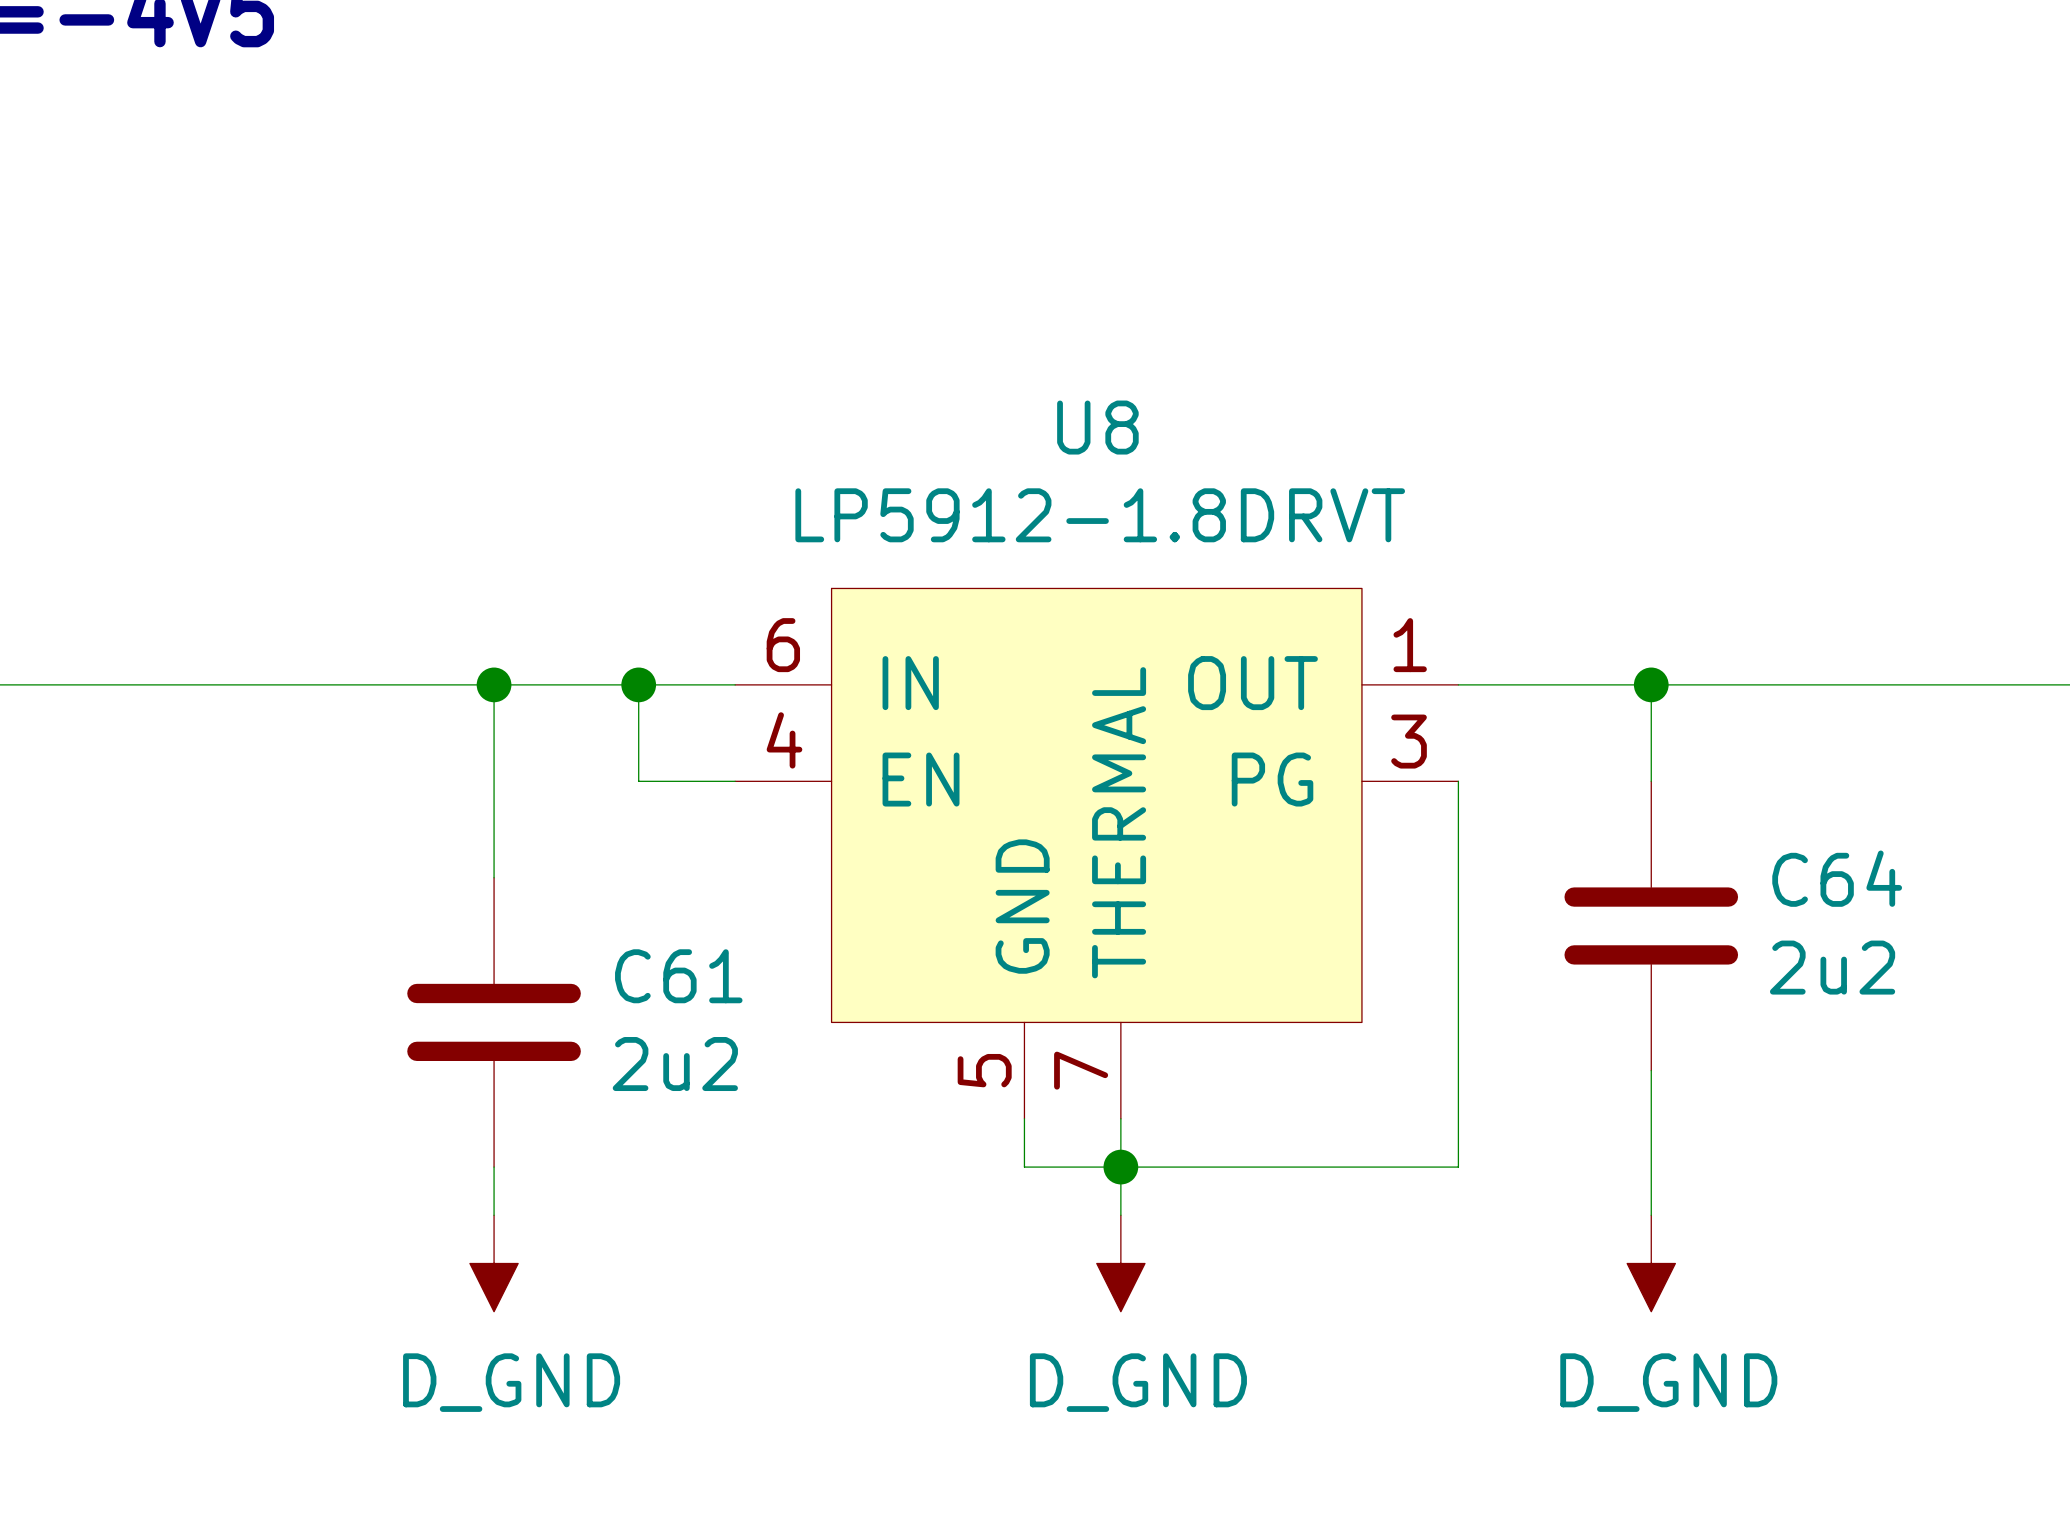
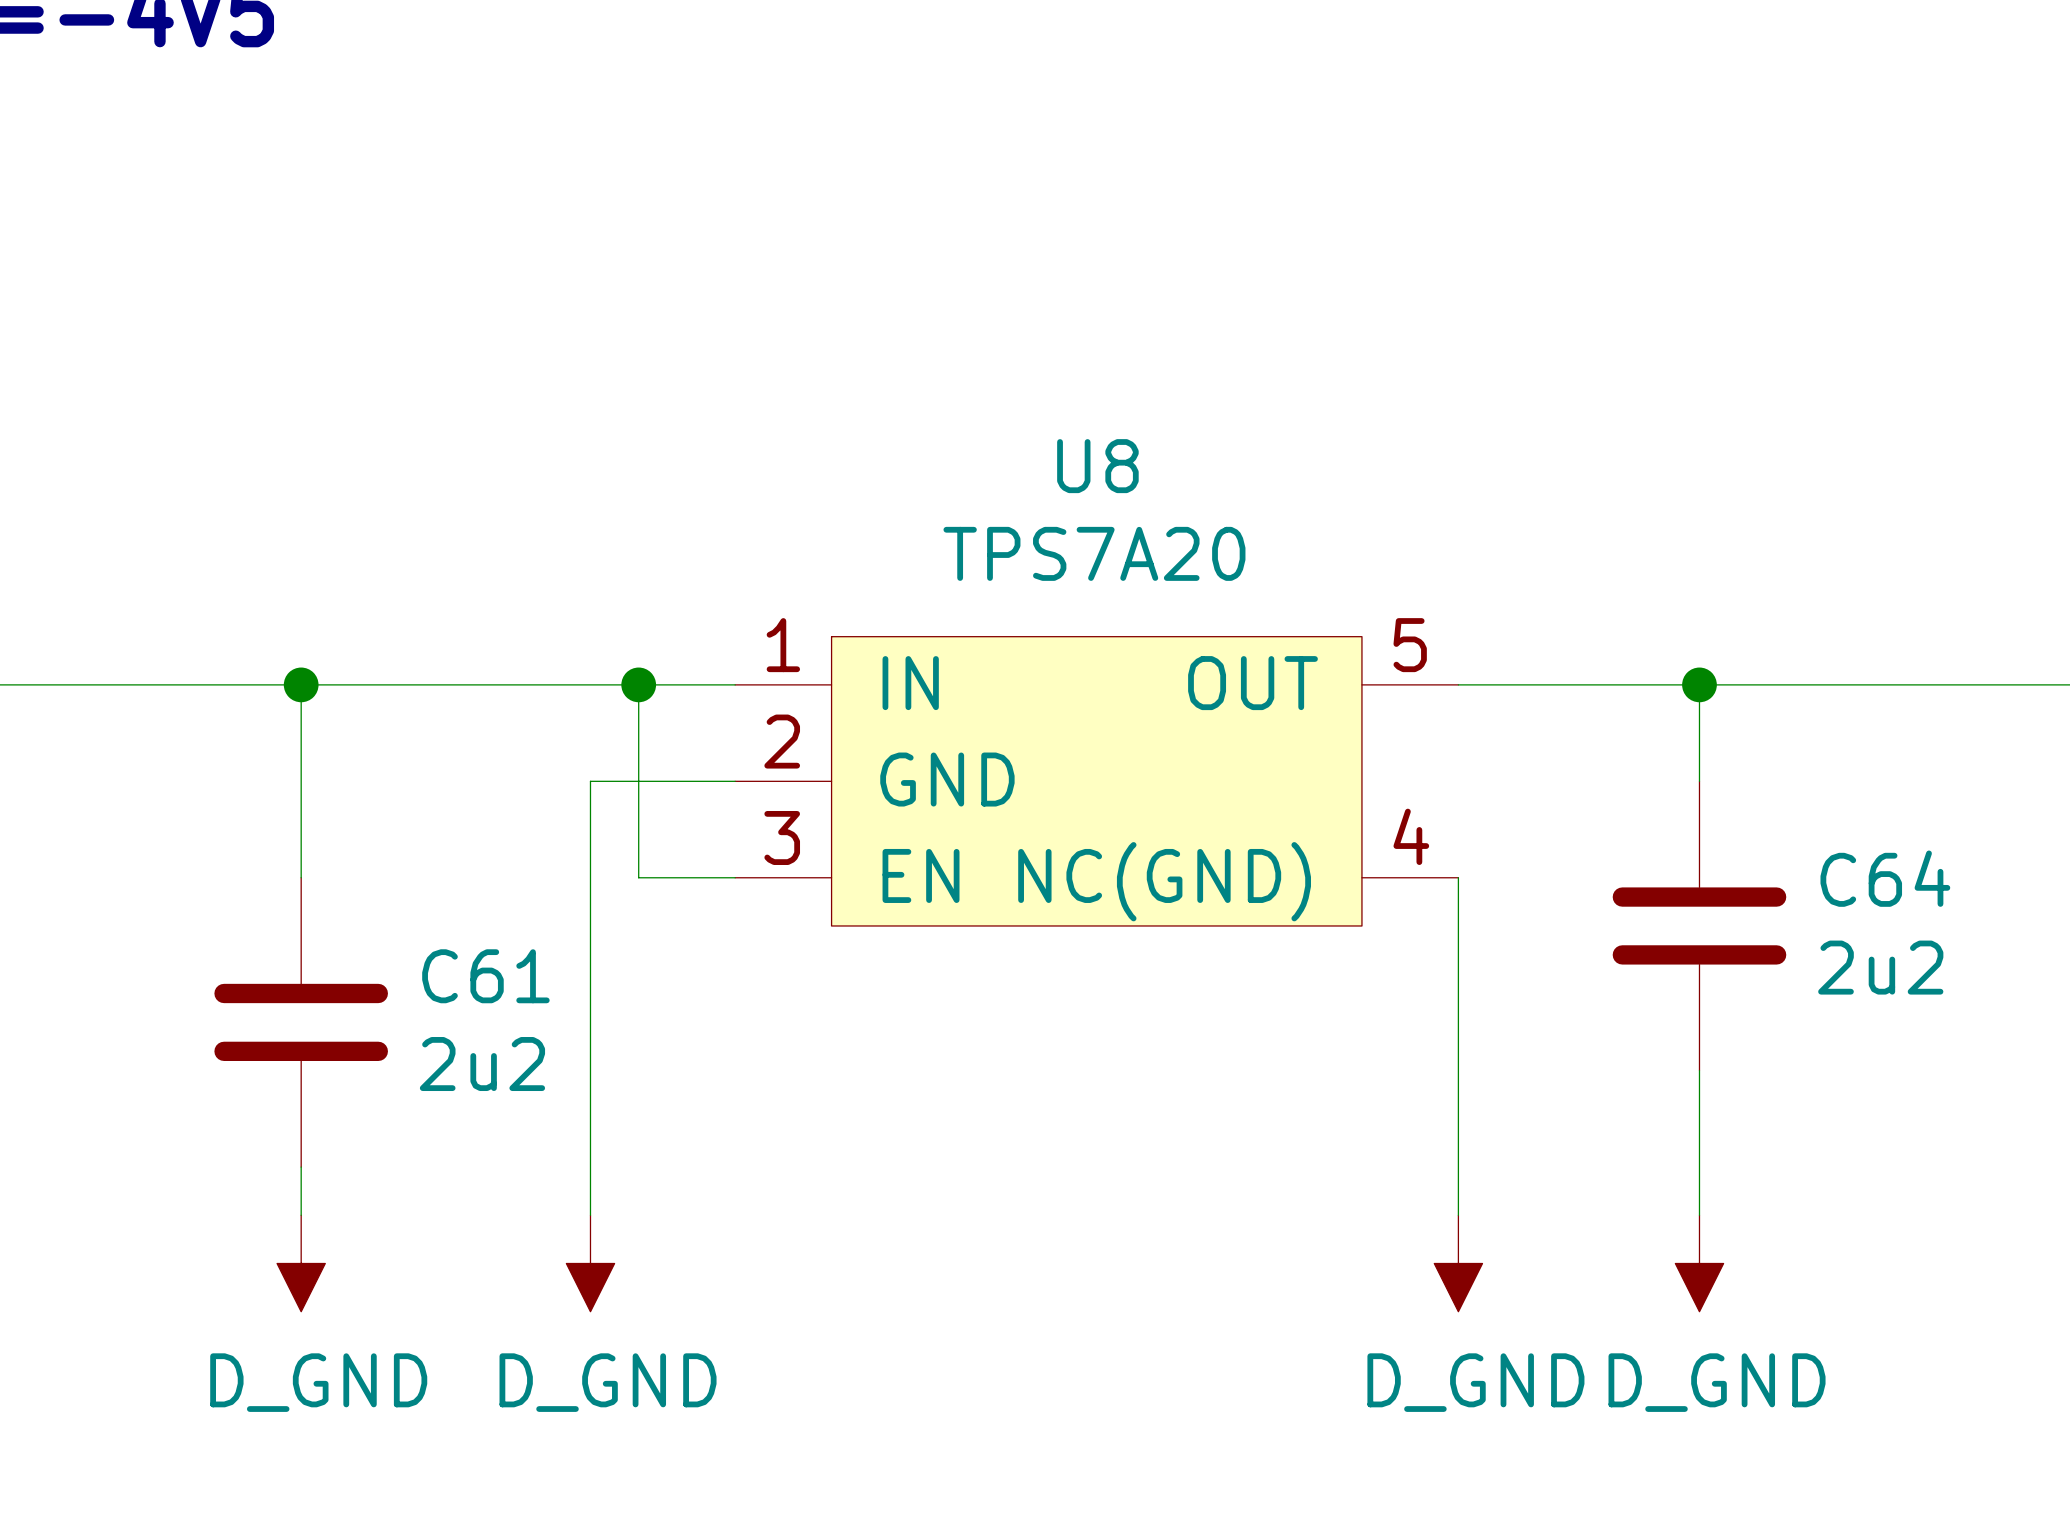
U8 name position: U8 (1097, 427) -> U8 (1097, 466)
U8 value: LP5912-1.8DRVT (1100, 515) -> TPS7A20 (1094, 553)
U8 symbol: [735, 588, 1459, 1119] -> [735, 636, 1459, 926]
wire: (494, 684) (494, 877) -> (301, 684) (301, 877)
junction position: (494, 684) -> (301, 684)
wire: (1651, 684) (1651, 781) -> (1699, 684) (1699, 781)
junction position: (1651, 684) -> (1699, 684)
wire: (1458, 781) (1458, 877) -> none
wire: none -> (735, 877) (638, 877) (638, 781) (590, 781) (590, 1215)
C64 position: (1651, 925) -> (1699, 925)
C61 position: (494, 1022) -> (301, 1022)
wire: (1651, 1070) (1651, 1215) -> (1699, 1070) (1699, 1215)
wire: (1024, 1118) (1024, 1167) (1458, 1167) -> (1458, 1215) (1458, 1167)
wire: (1120, 1118) (1120, 1215) -> none
wire: (494, 1167) (494, 1215) -> (301, 1167) (301, 1215)
junction: (1120, 1167) -> none
power symbol: none -> D_GND (301, 1263)
power symbol: D_GND (494, 1263) -> none
power symbol: none -> D_GND (590, 1263)
power symbol: D_GND (1120, 1263) -> none
power symbol: none -> D_GND (1458, 1263)
power symbol position: D_GND (1651, 1263) -> D_GND (1699, 1263)

